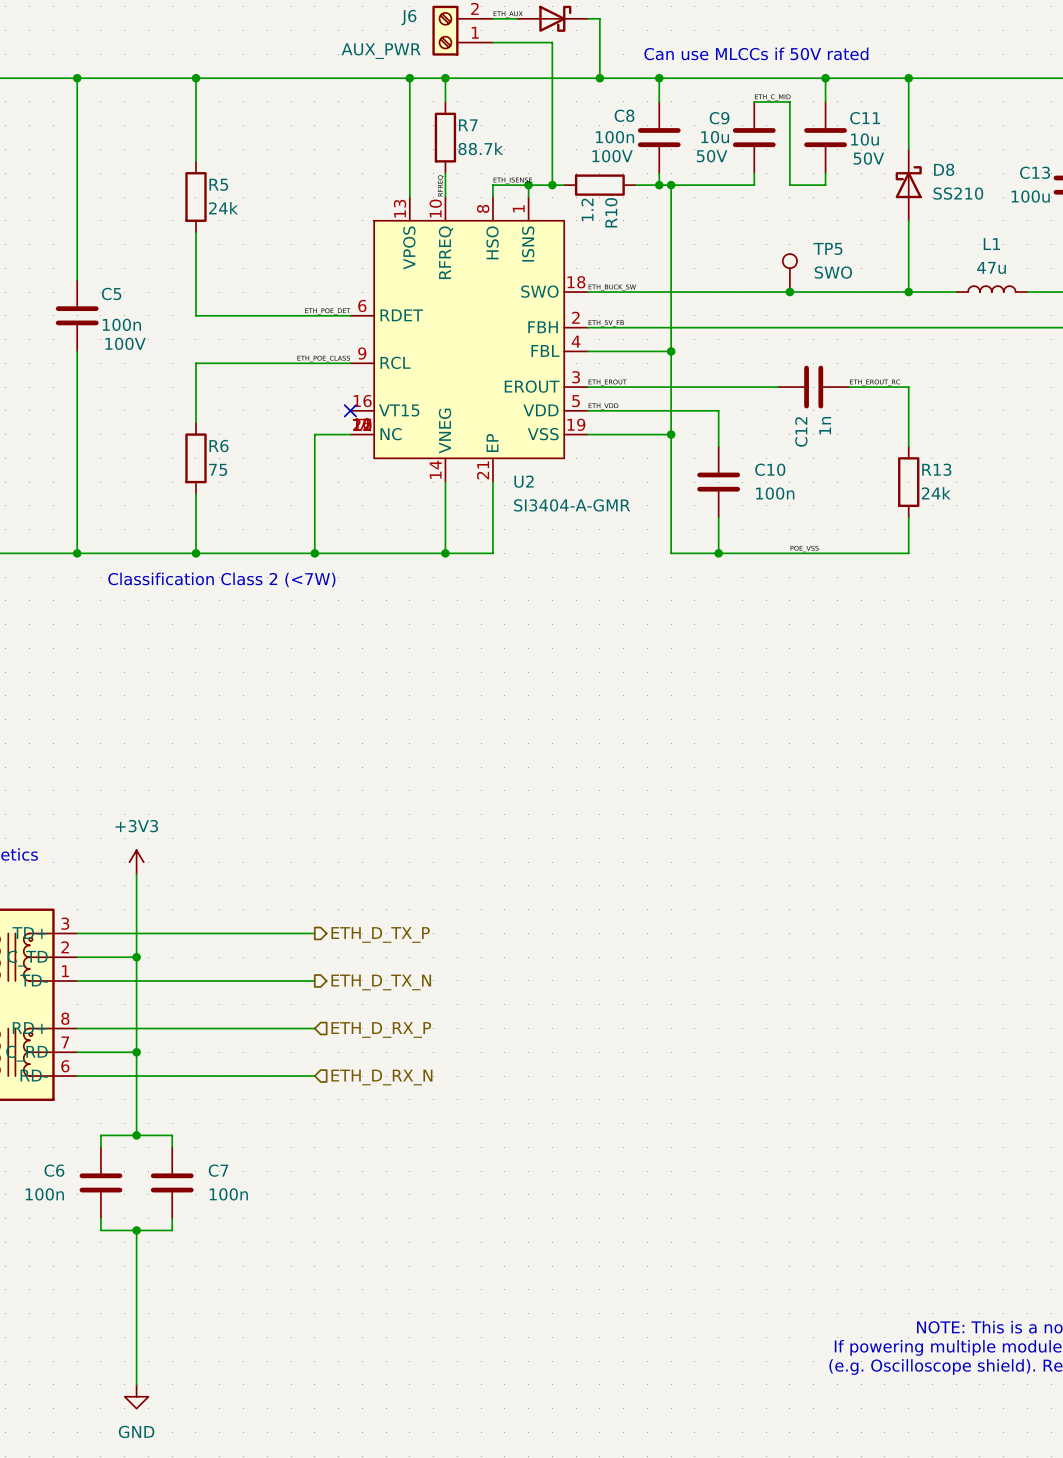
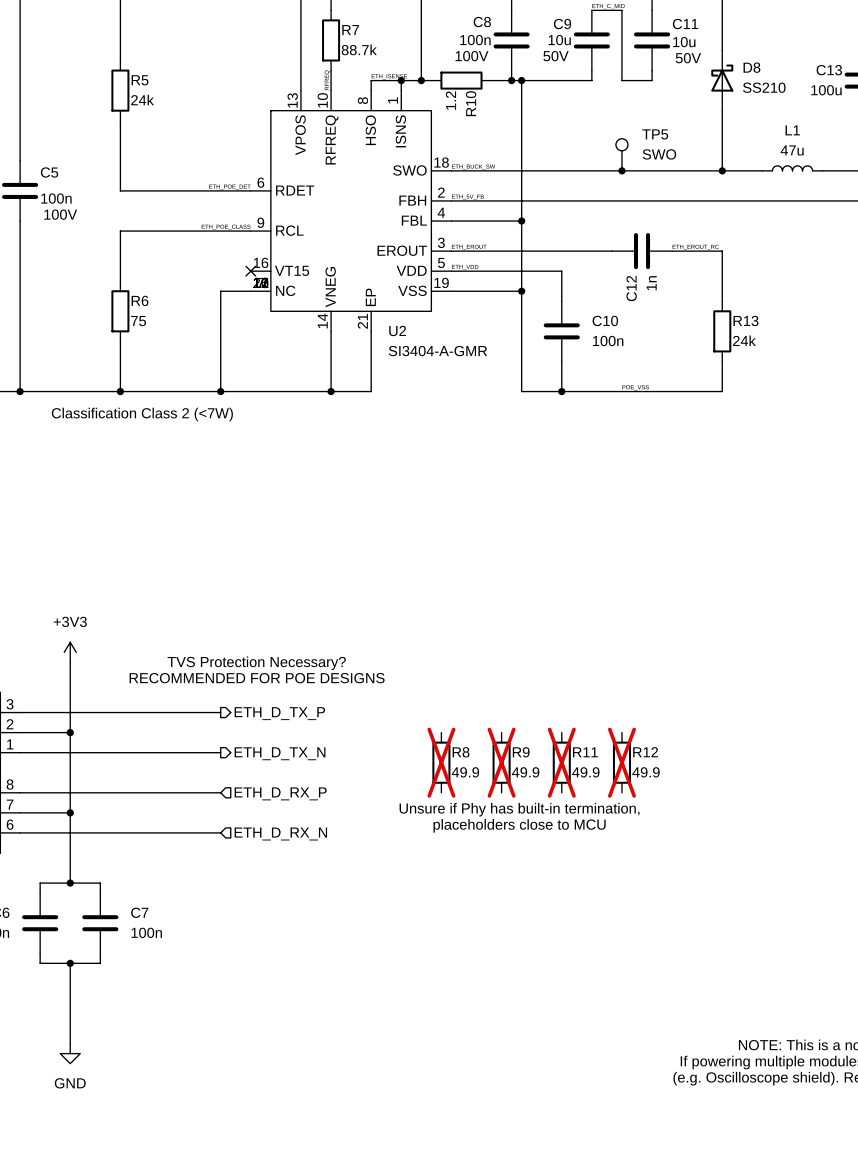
text: none -> TVS Protection Necessary? (256, 663)
text: none -> RECOMMENDED FOR POE DESIGNS (257, 678)
R8: none -> 49.9 (441, 762)
R9: none -> 49.9 (501, 762)
R11: none -> 49.9 (561, 762)
R12: none -> 49.9 (621, 762)
text: none -> Unsure if Phy has built-in termination, (519, 809)
text: none -> placeholders close to MCU (519, 825)
wire: (136, 1325) (136, 1384) -> none
power symbol position: GND (136, 1396) -> GND (70, 1053)

